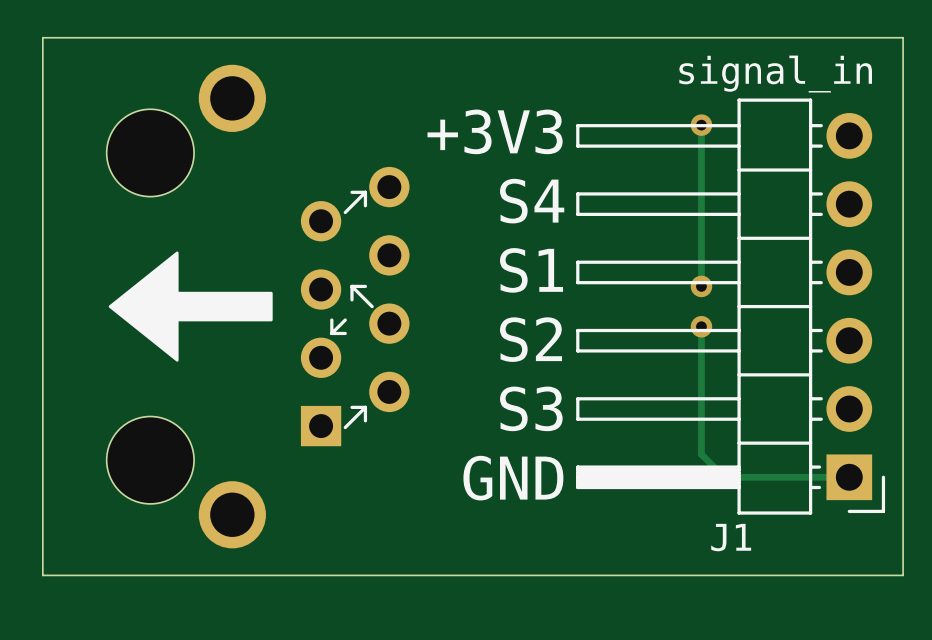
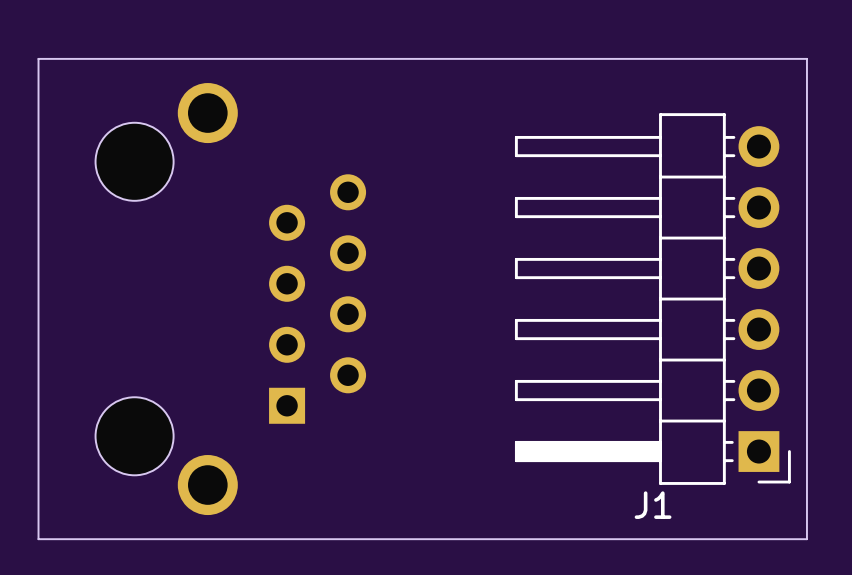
J1 value: signal_in (775, 74) -> none
track: (701, 125) (701, 286) -> none
via: (701, 125) -> none
text: +3V3 (495, 131) -> none
line: (365, 192) (365, 205) -> none
line: (365, 192) (345, 212) -> none
line: (365, 192) (351, 192) -> none
text: S4 (532, 201) -> none
drawing: [108, 251, 273, 362] -> none
text: S1 (531, 270) -> none
line: (351, 286) (351, 299) -> none
line: (351, 286) (372, 306) -> none
line: (365, 286) (351, 286) -> none
via: (701, 286) -> none
line: (331, 320) (331, 333) -> none
line: (345, 320) (331, 333) -> none
track: (701, 326) (701, 454) (724, 477) (849, 477) -> none
via: (701, 326) -> none
line: (345, 333) (331, 333) -> none
text: S2 (531, 339) -> none
line: (365, 407) (365, 420) -> none
line: (365, 407) (345, 427) -> none
line: (365, 407) (351, 407) -> none
text: S3 (531, 408) -> none
text: GND (513, 478) -> none

